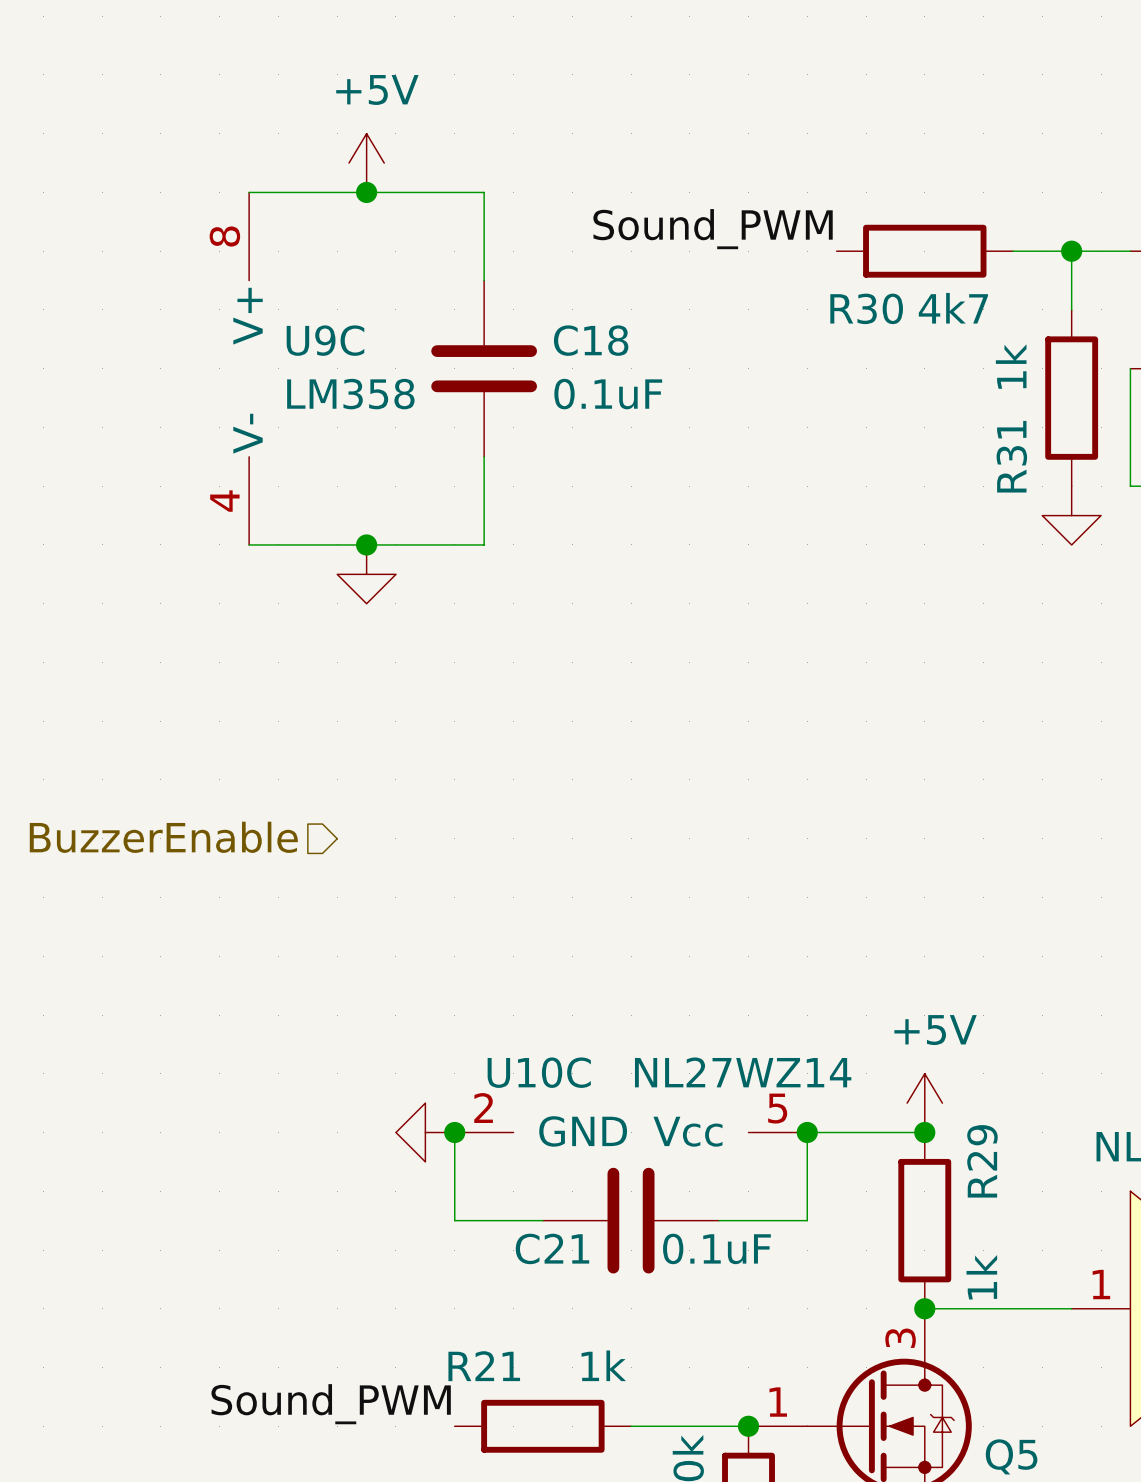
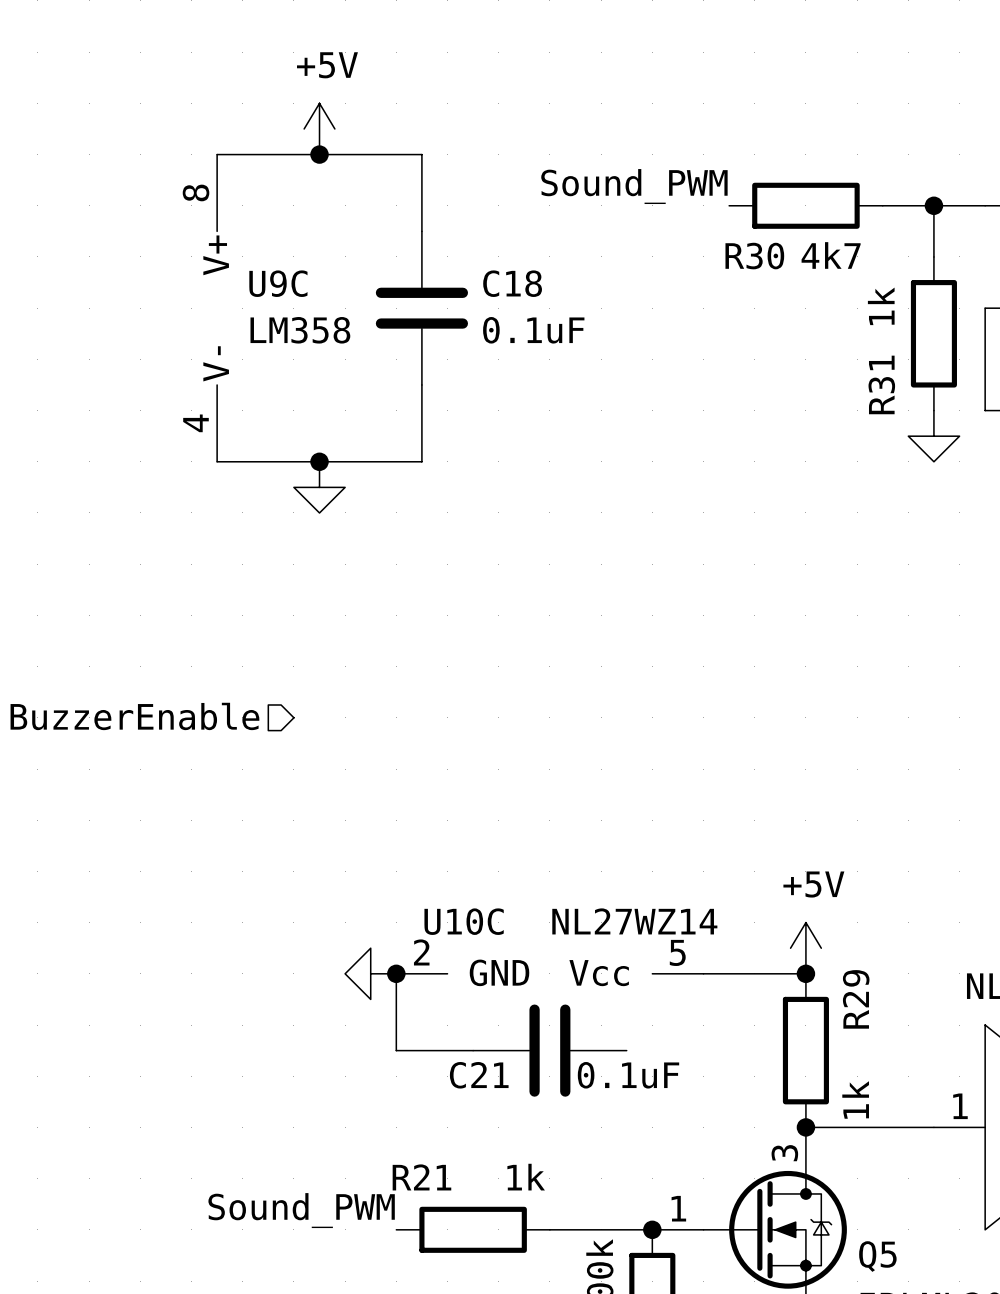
wire: (807, 1132) (807, 1220) (719, 1220) -> none
junction: (807, 1132) -> none

